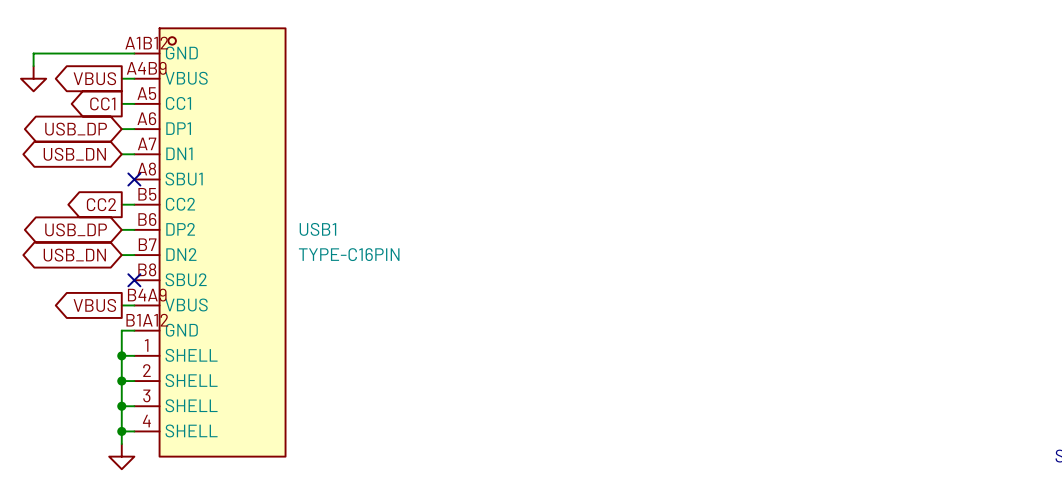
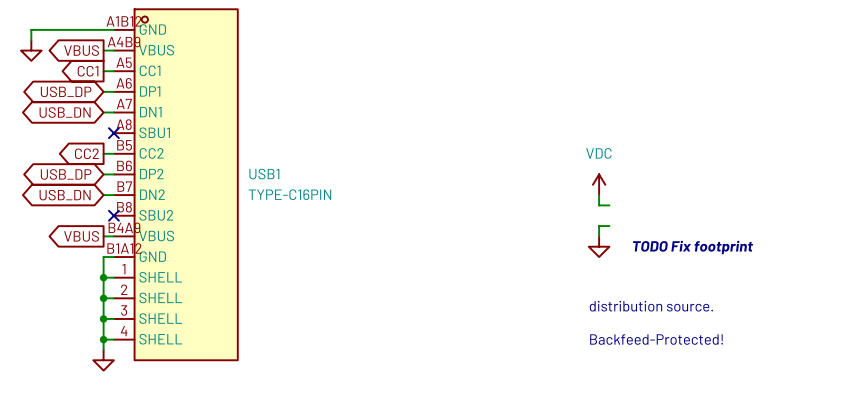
power symbol: none -> VDC (599, 184)
wire: none -> (599, 195) (599, 205) (609, 205)
wire: none -> (609, 226) (599, 226) (599, 236)
power symbol: none -> (599, 246)
text: none -> TODO Fix footprint (693, 247)
text: none -> distribution source. (651, 306)
text: none -> Backfeed-Protected! (656, 339)

